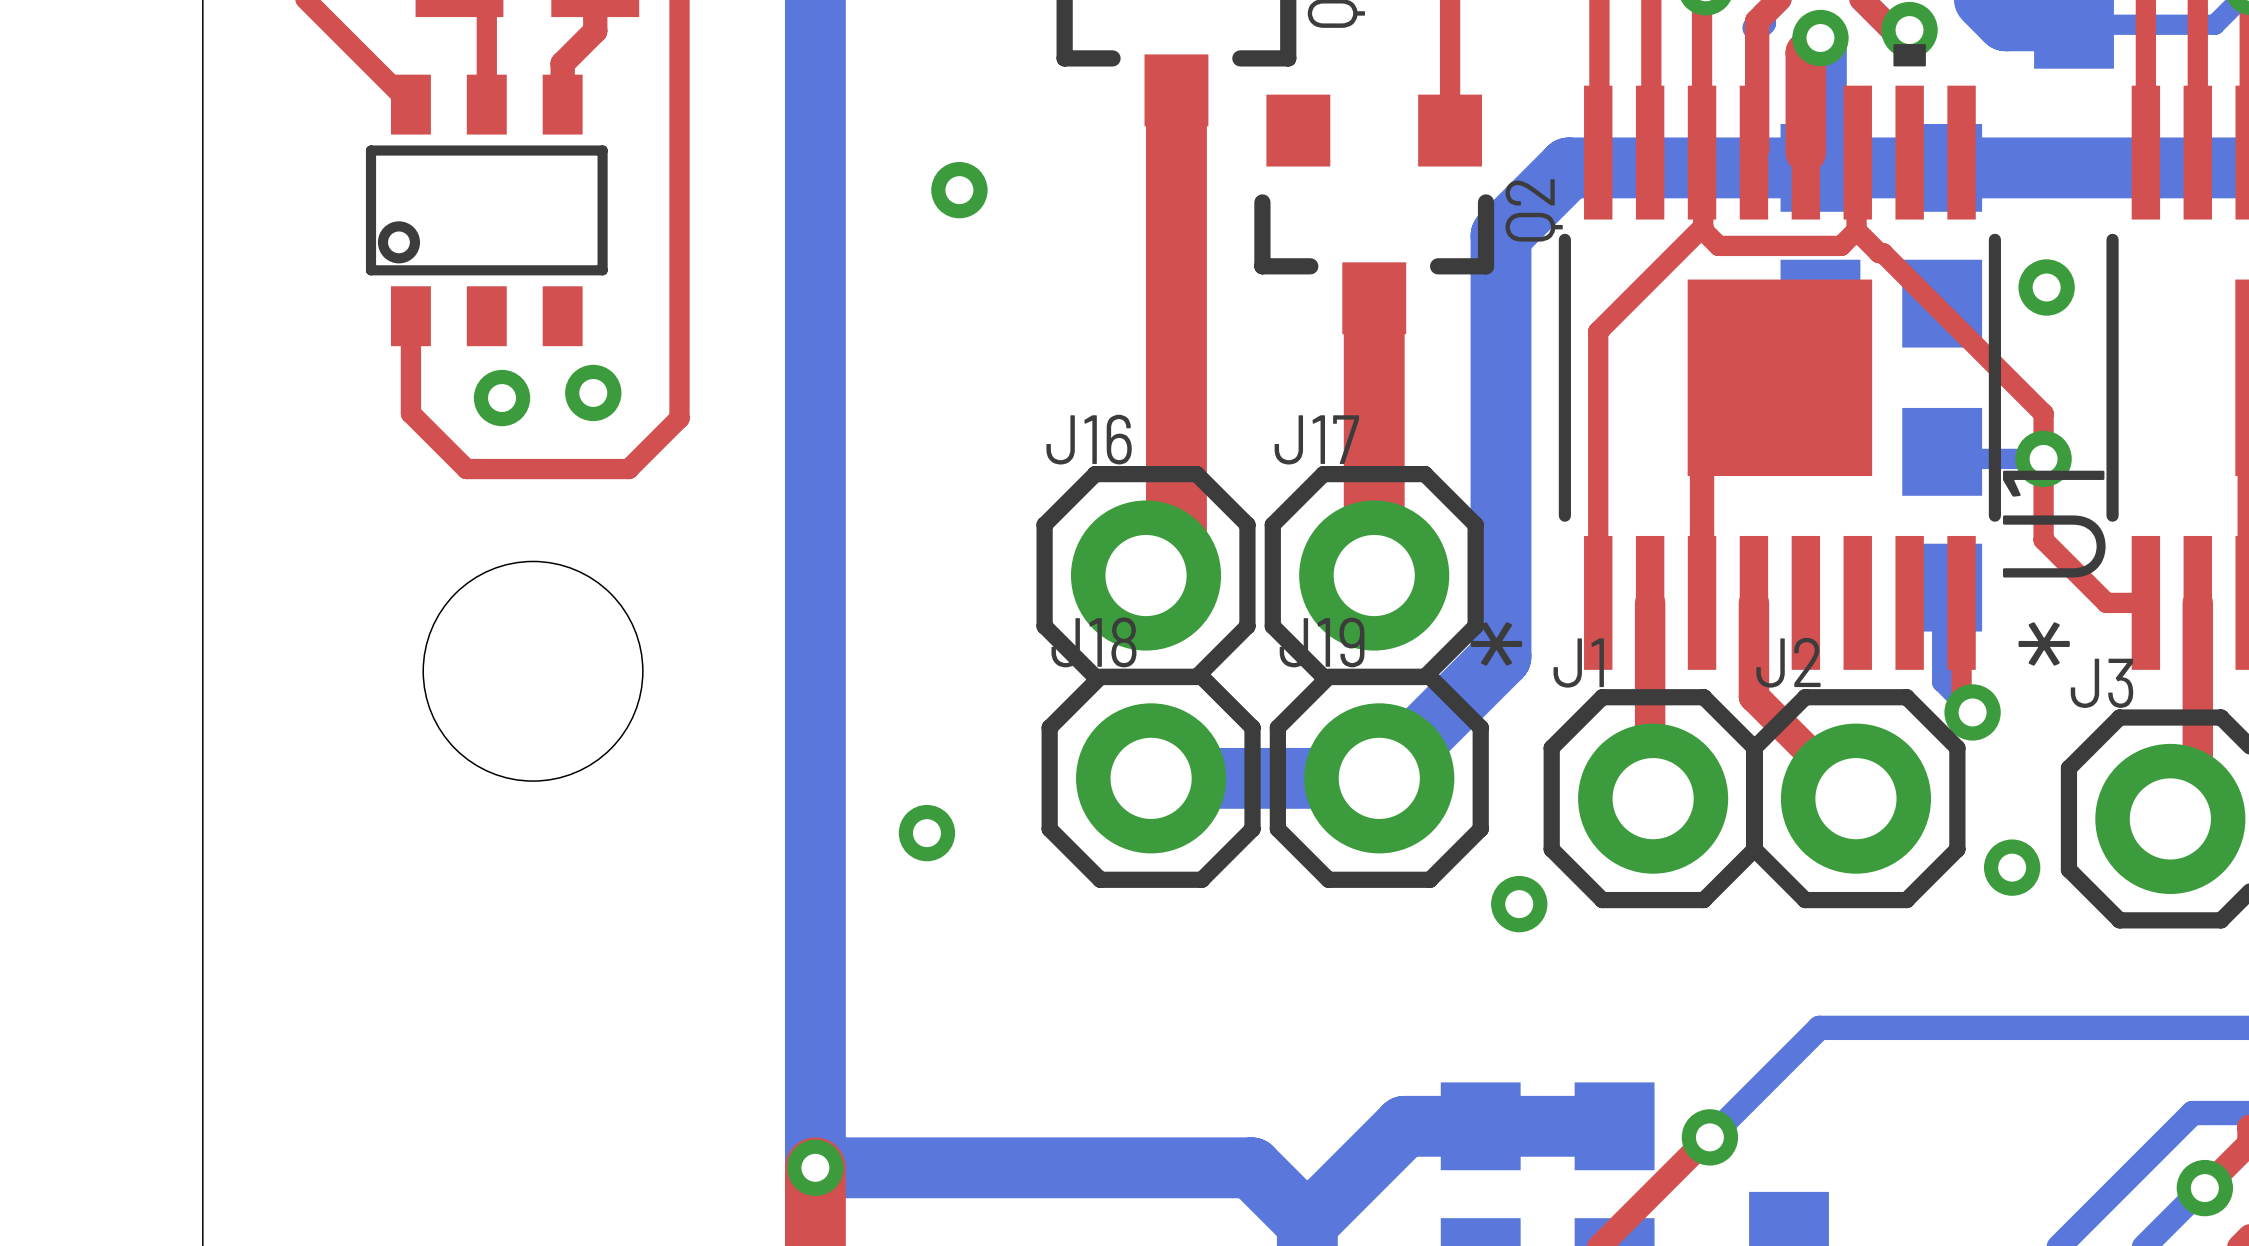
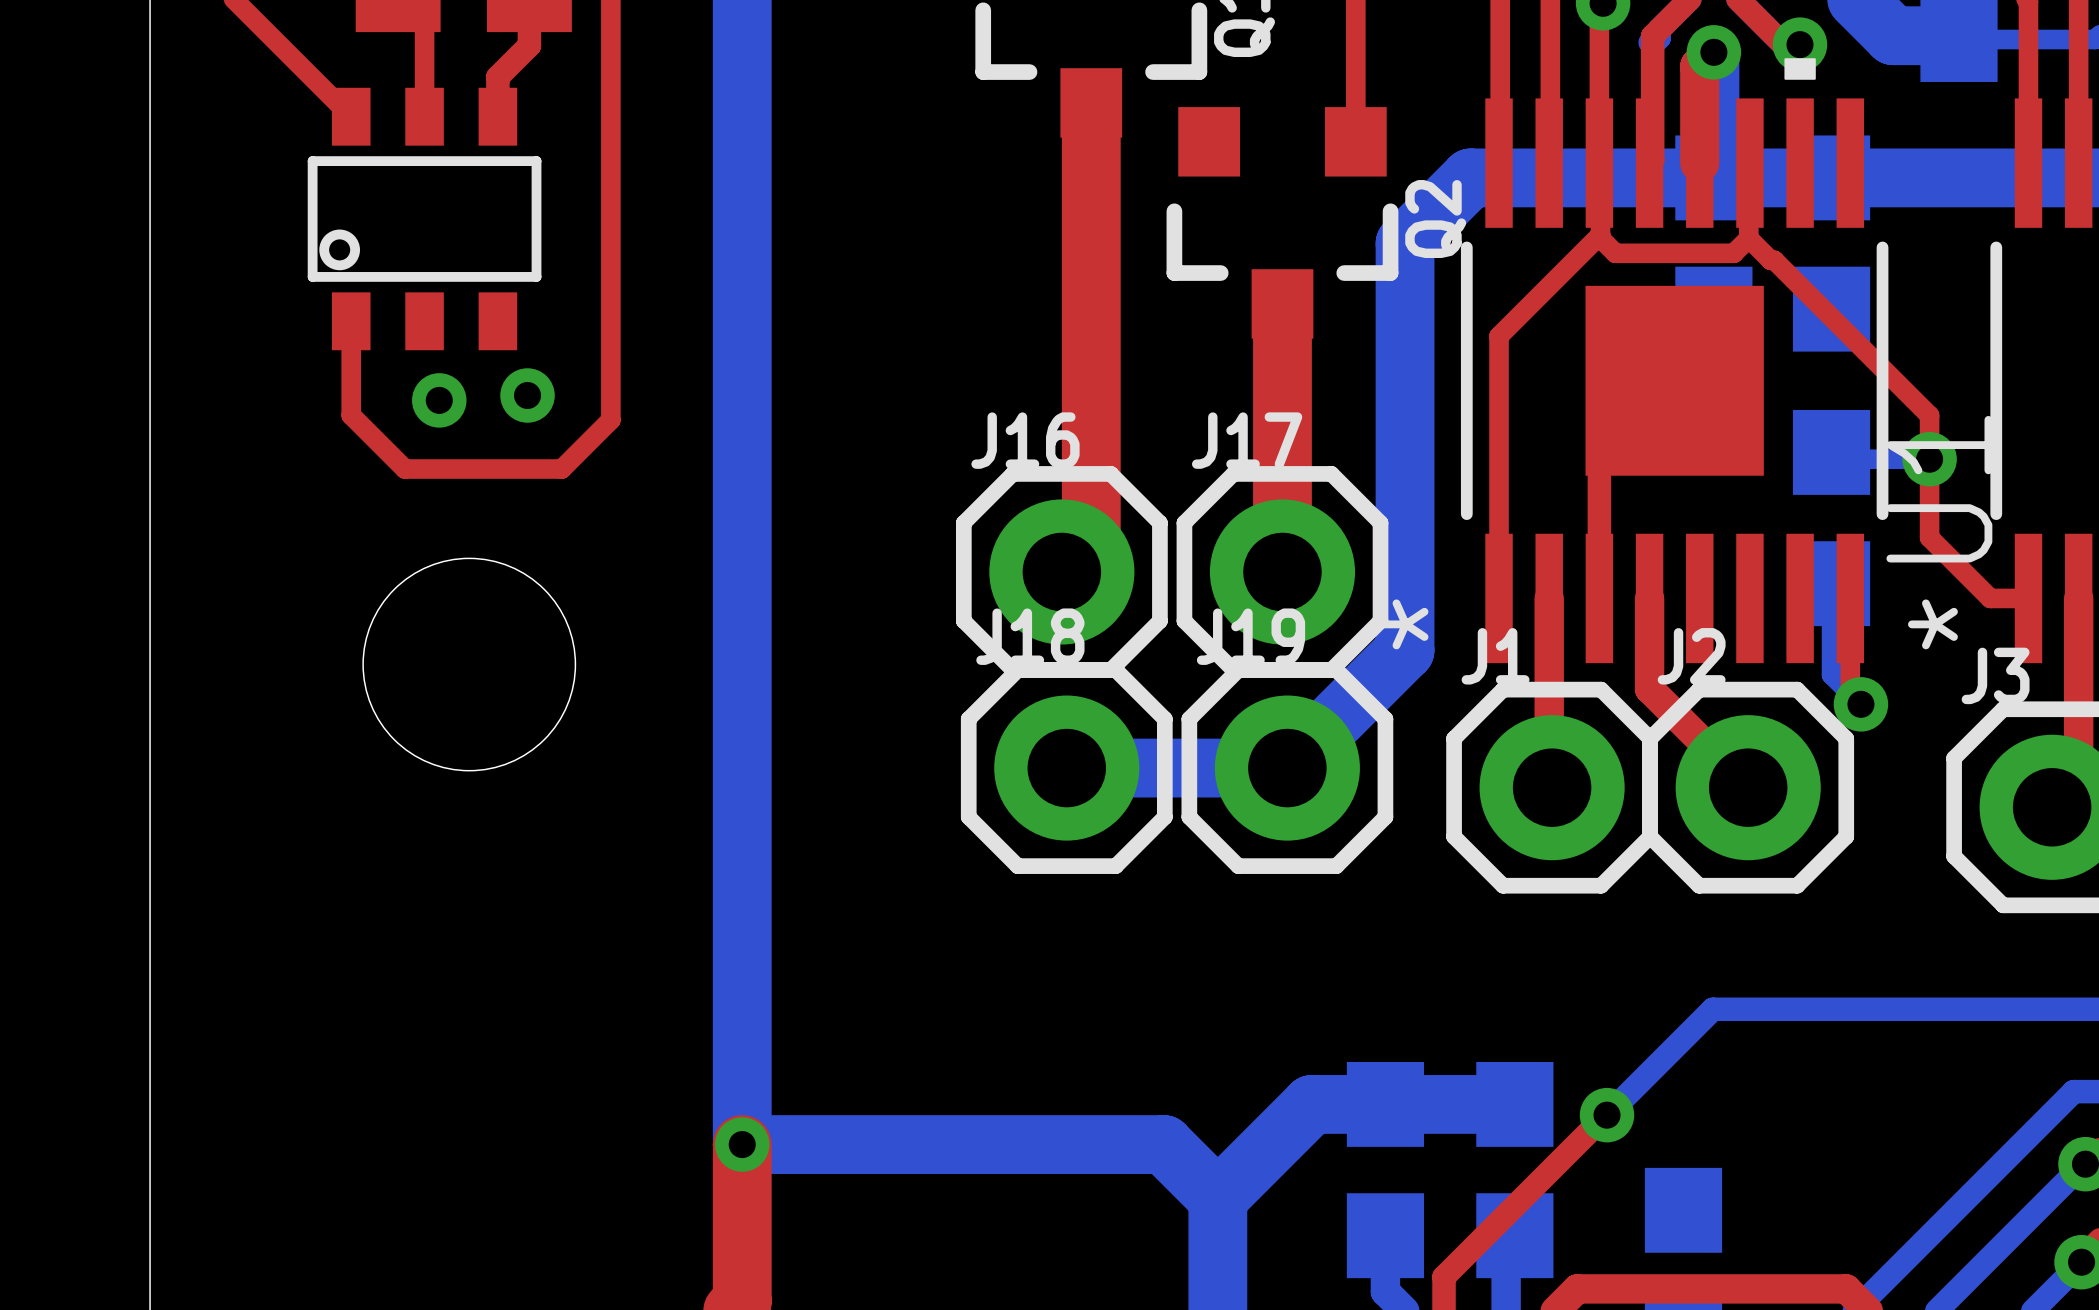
via: (959, 190) -> none
via: (2046, 287) -> none
via: (926, 833) -> none
via: (2012, 867) -> none
via: (1519, 904) -> none

